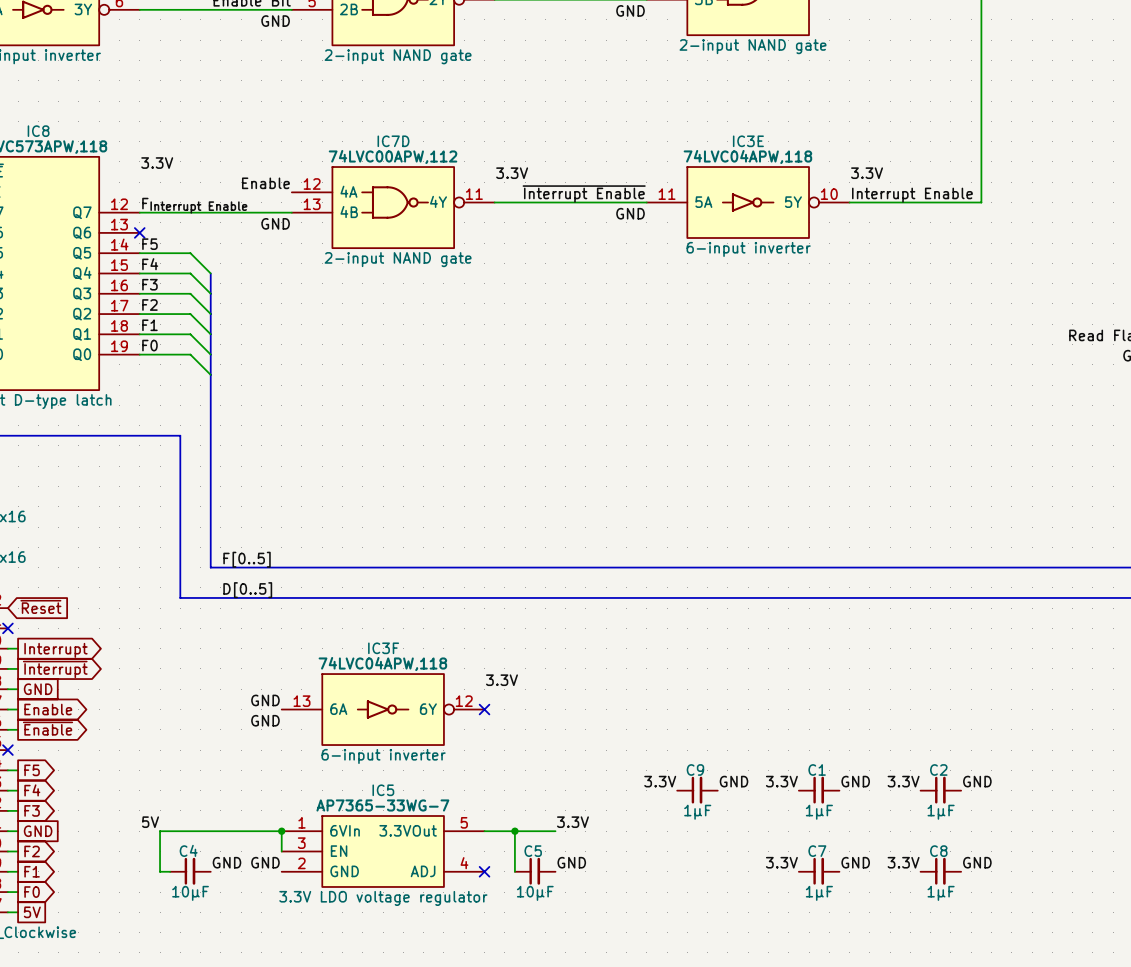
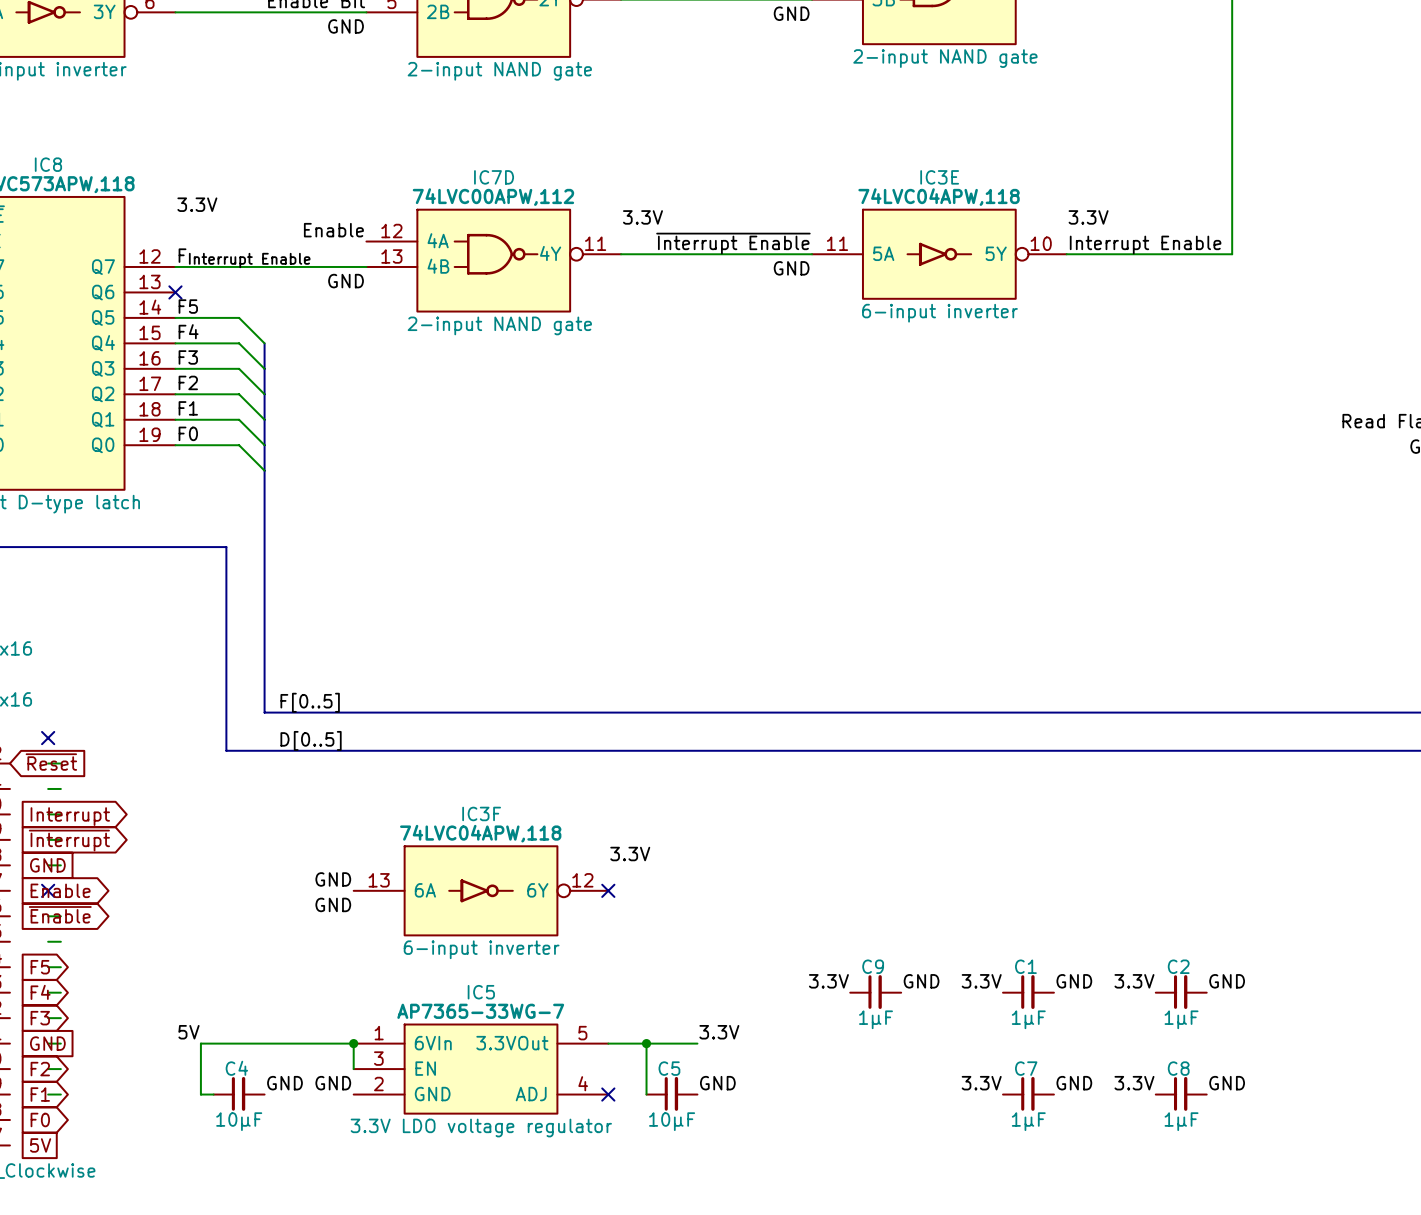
no-connect mark: none -> (48, 738)
no-connect mark: (7, 628) -> none
wire: (7, 648) (18, 648) -> (48, 763) (60, 763)
wire: (7, 668) (18, 668) -> (48, 788) (60, 788)
wire: (7, 689) (18, 689) -> (48, 814) (60, 814)
wire: (7, 709) (18, 709) -> (48, 839) (60, 839)
no-connect mark: none -> (48, 890)
wire: (7, 729) (18, 729) -> (48, 865) (60, 865)
no-connect mark: (7, 750) -> none
wire: (7, 770) (18, 770) -> (48, 916) (60, 916)
wire: (7, 790) (18, 790) -> (48, 941) (60, 941)
wire: (7, 810) (18, 810) -> (48, 967) (60, 967)
wire: (7, 831) (18, 831) -> (48, 992) (60, 992)
wire: (7, 851) (18, 851) -> (48, 1018) (60, 1018)
wire: (7, 871) (18, 871) -> (48, 1043) (60, 1043)
wire: (7, 892) (18, 892) -> (48, 1069) (60, 1069)
wire: (7, 912) (18, 912) -> (48, 1094) (60, 1094)

